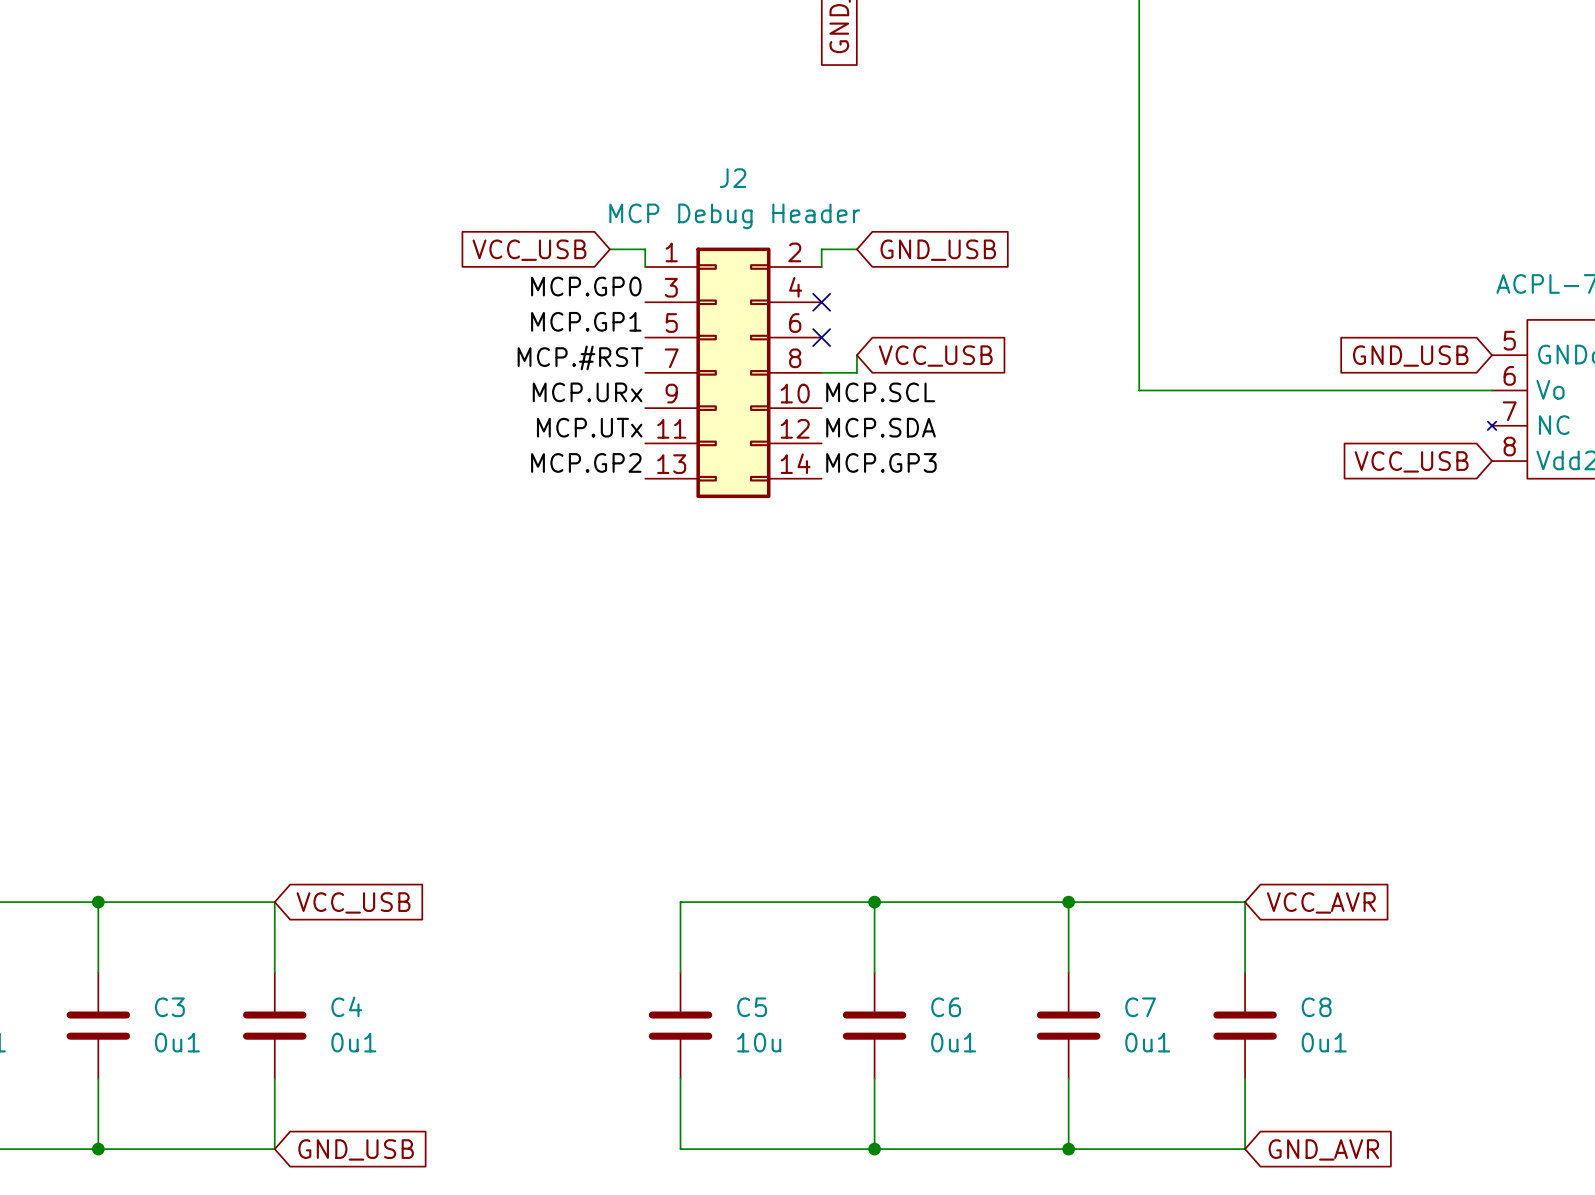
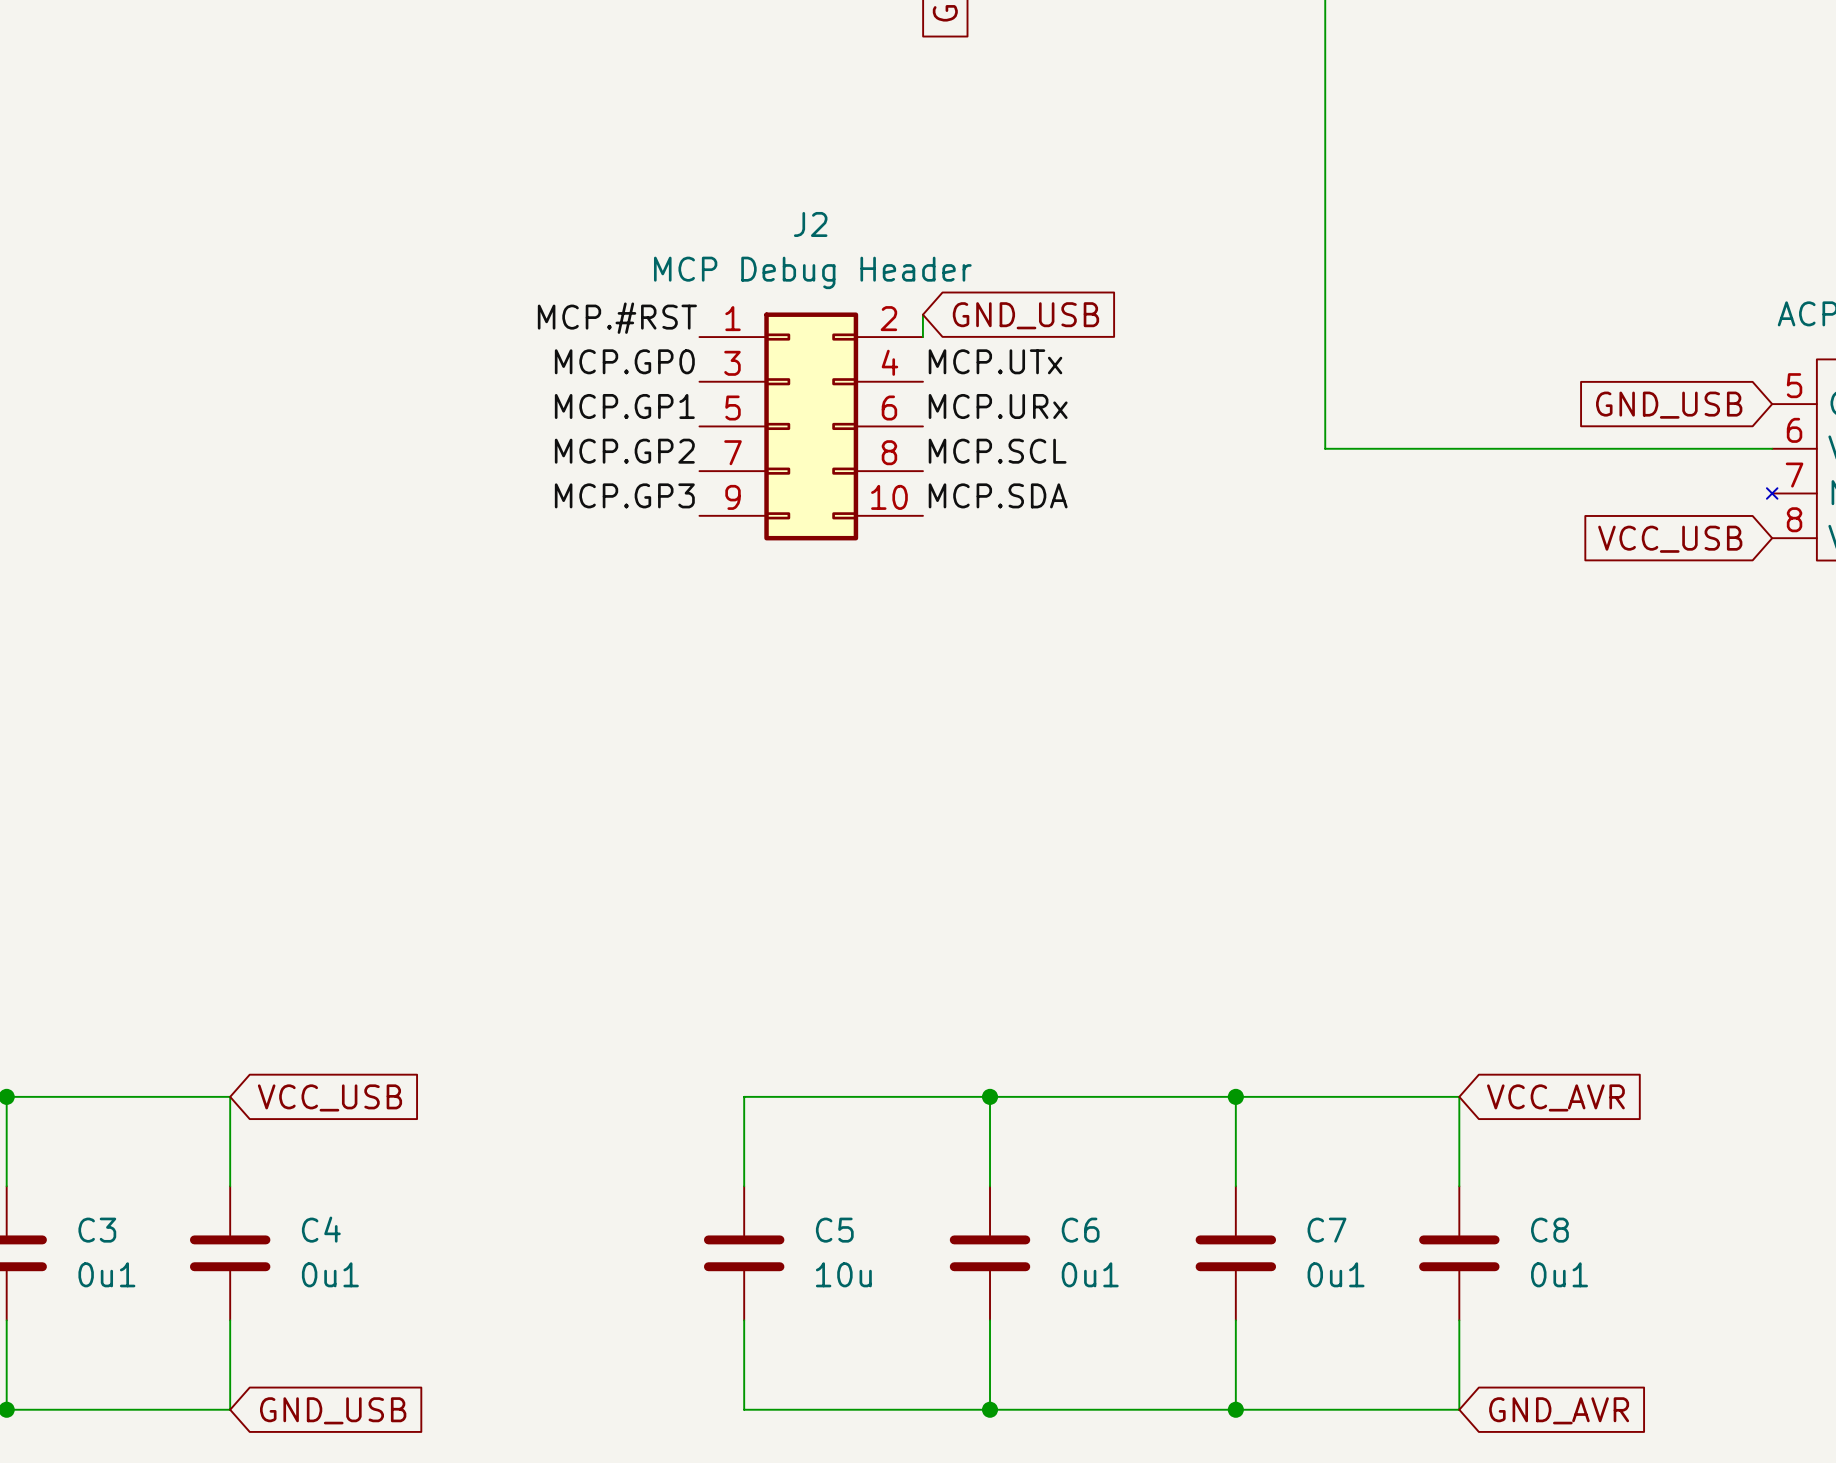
J2 name position: J2 (733, 178) -> J2 (810, 224)
J2 value position: MCP Debug Header (734, 216) -> MCP Debug Header (812, 272)
J2 symbol: [645, 247, 822, 499] -> [699, 312, 923, 541]
wire: (609, 249) (645, 249) (645, 266) -> none
wire: (856, 249) (821, 249) (821, 266) -> none
global label: VCC_USB (529, 250) -> none
global label position: GND_USB (938, 250) -> GND_USB (1025, 315)
wire: none -> (922, 314) (922, 337)
label: MCP.GP0 (586, 286) -> MCP.#RST (617, 318)
no-connect mark: (821, 302) -> none
label: MCP.GP1 (586, 321) -> MCP.GP0 (624, 361)
label: none -> MCP.UTx (995, 361)
no-connect mark: (821, 337) -> none
wire: (856, 355) (856, 372) (821, 372) -> none
global label: VCC_USB (935, 356) -> none
label: MCP.#RST (580, 357) -> MCP.GP1 (624, 406)
label: none -> MCP.URx (998, 406)
label: MCP.URx (587, 392) -> MCP.GP2 (624, 451)
label: MCP.UTx (589, 427) -> MCP.GP3 (624, 495)
label: MCP.GP2 (586, 462) -> none
label: MCP.GP3 (881, 462) -> none

